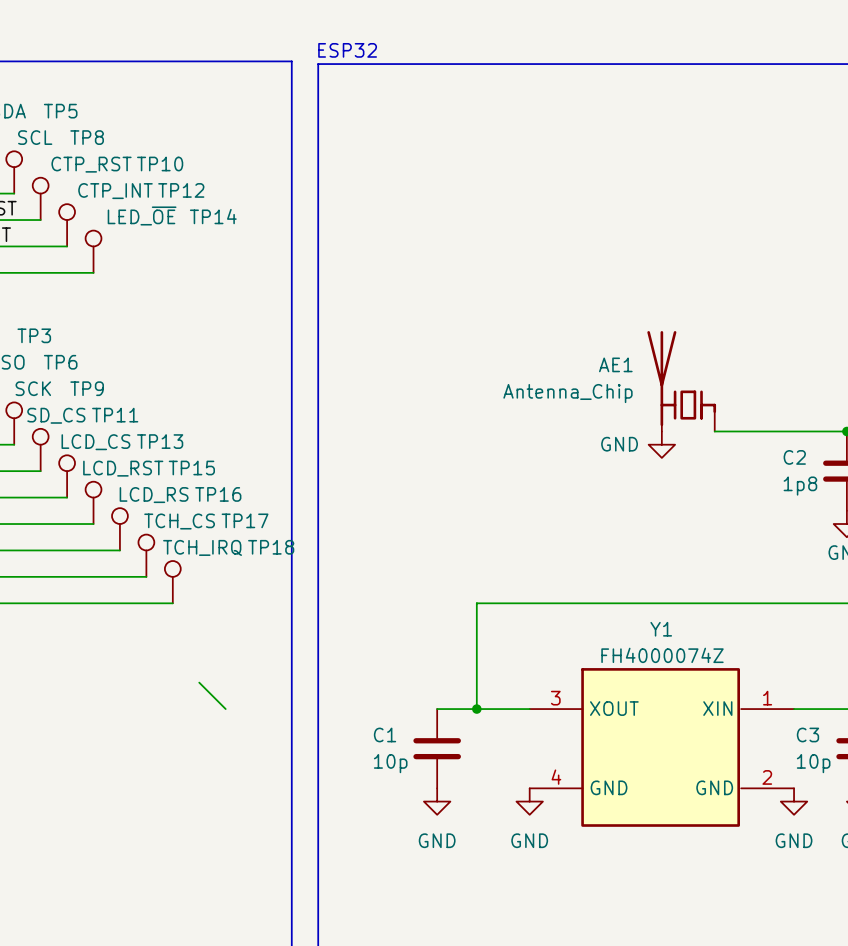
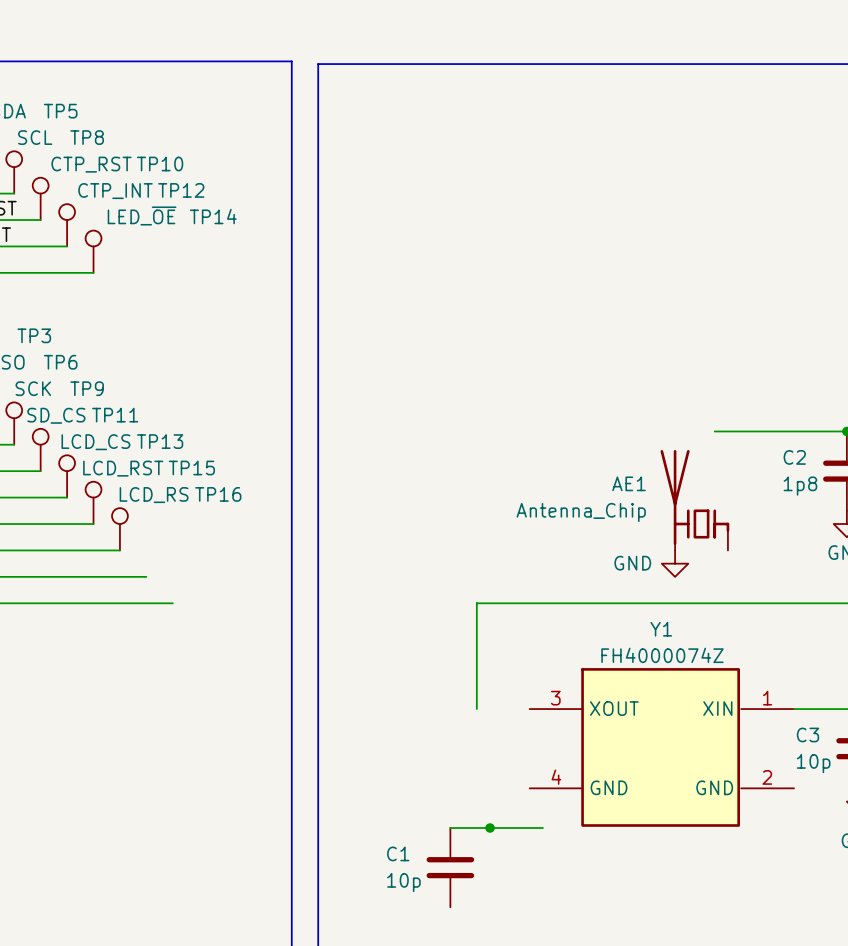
text: ESP32 (347, 50) -> none
AE1 position: (681, 381) -> (694, 500)
power symbol position: GND (661, 444) -> GND (675, 563)
TP17: TCH_CS (146, 555) -> none
TP18: TCH_IRQ (172, 582) -> none
wire: (199, 682) (225, 709) -> none
wire: (437, 709) (529, 709) -> (450, 828) (542, 828)
junction: (476, 709) -> none
C1 position: (437, 748) -> (450, 867)
power symbol: GND (437, 801) -> none
power symbol: GND (529, 801) -> none
power symbol: GND (794, 801) -> none
junction: none -> (490, 828)

